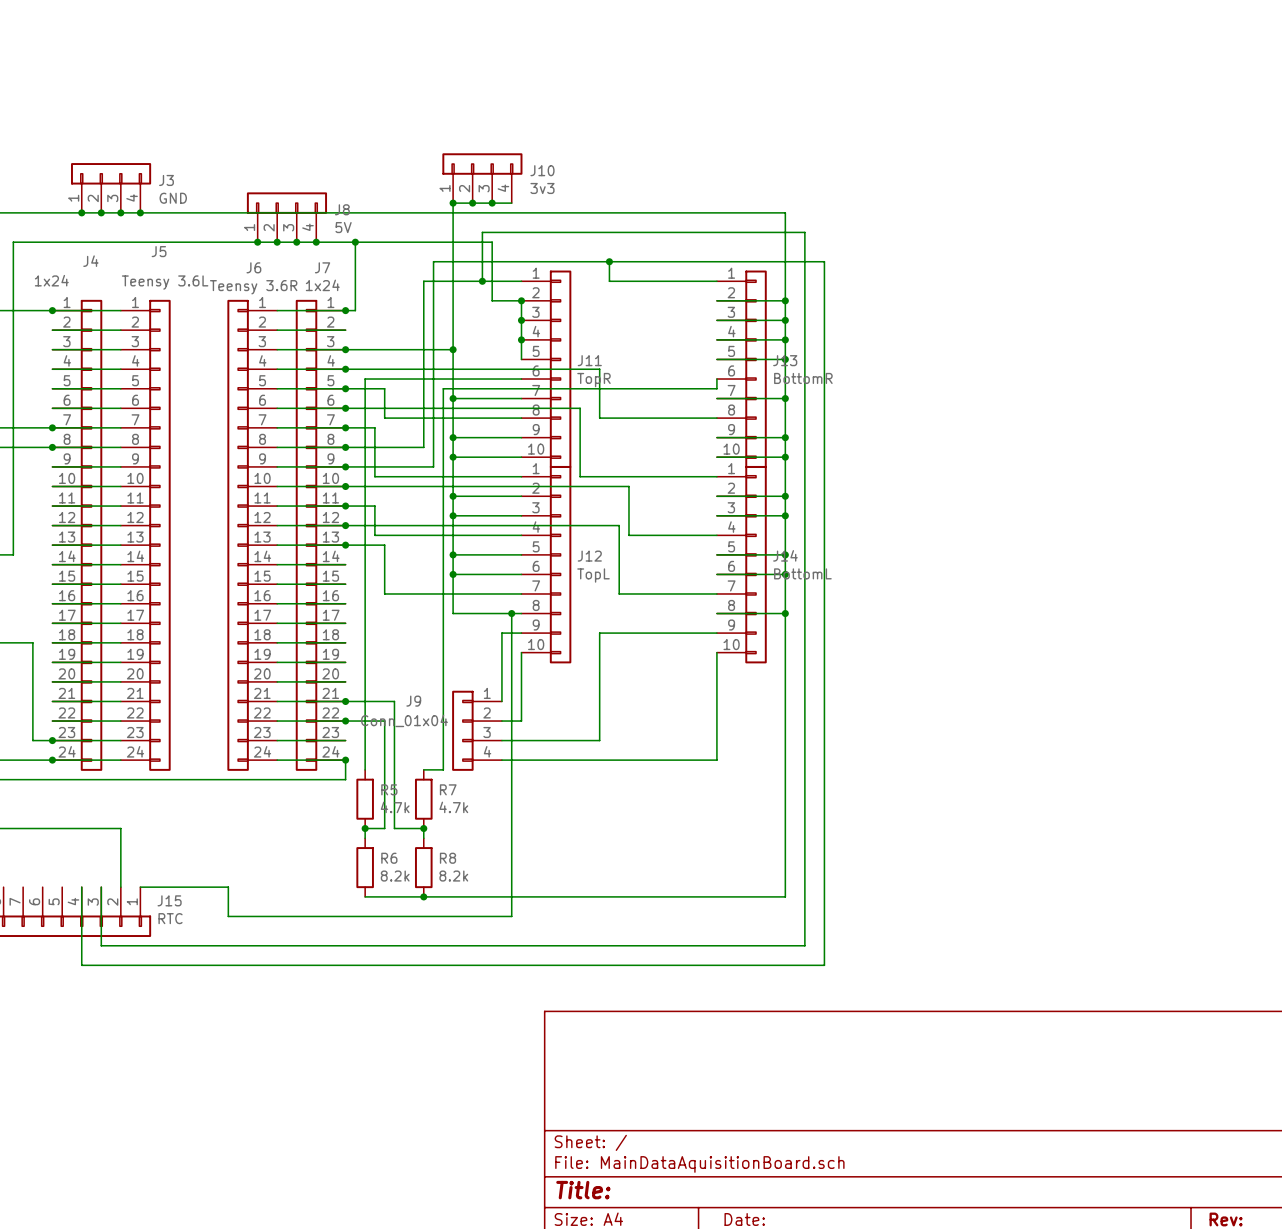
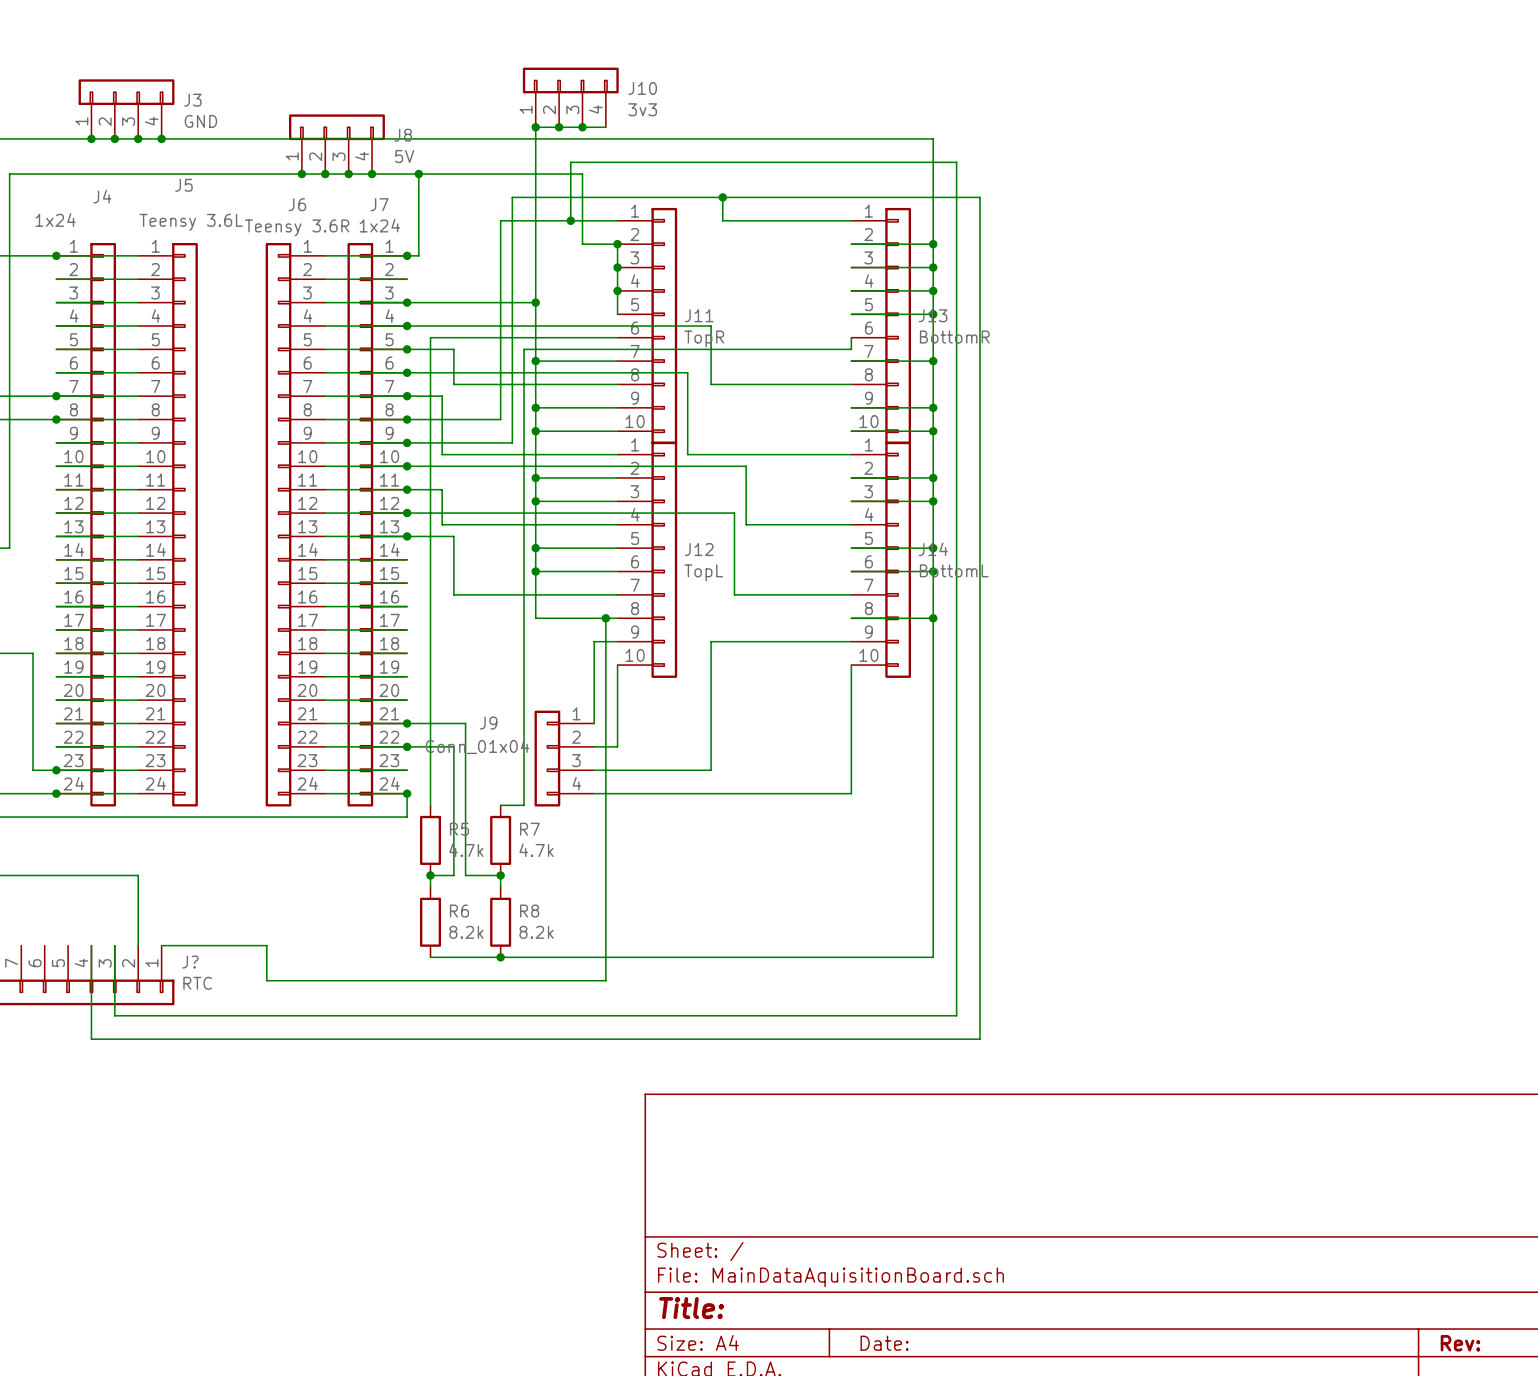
J15 name: J15 (169, 900) -> J? (190, 962)

